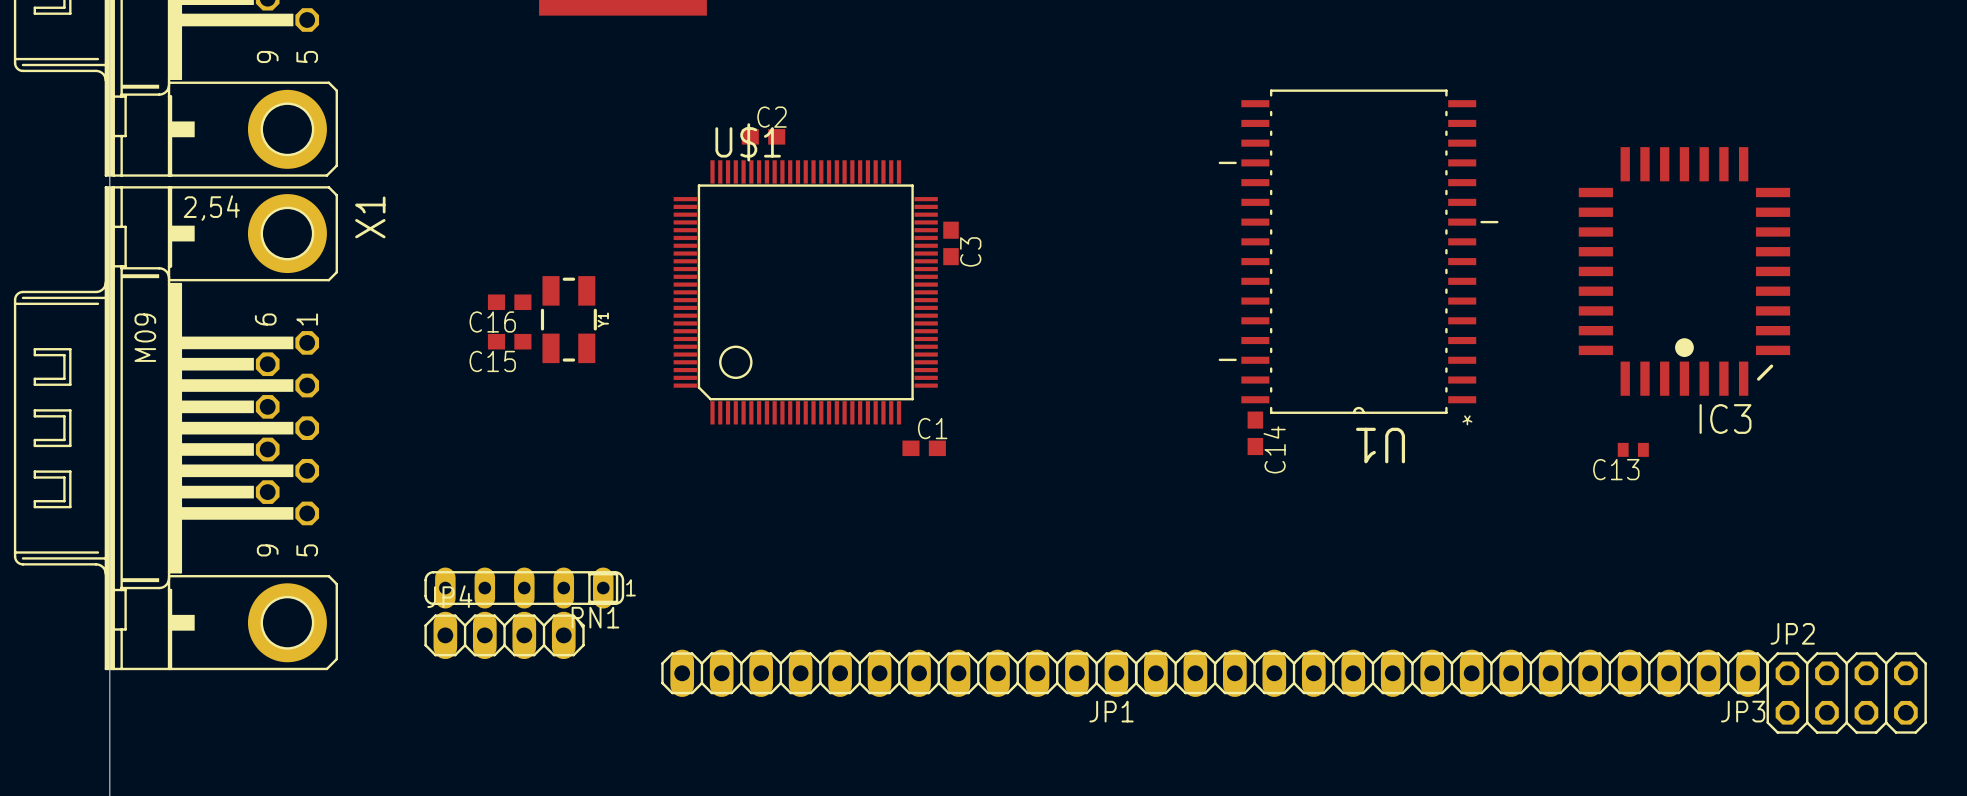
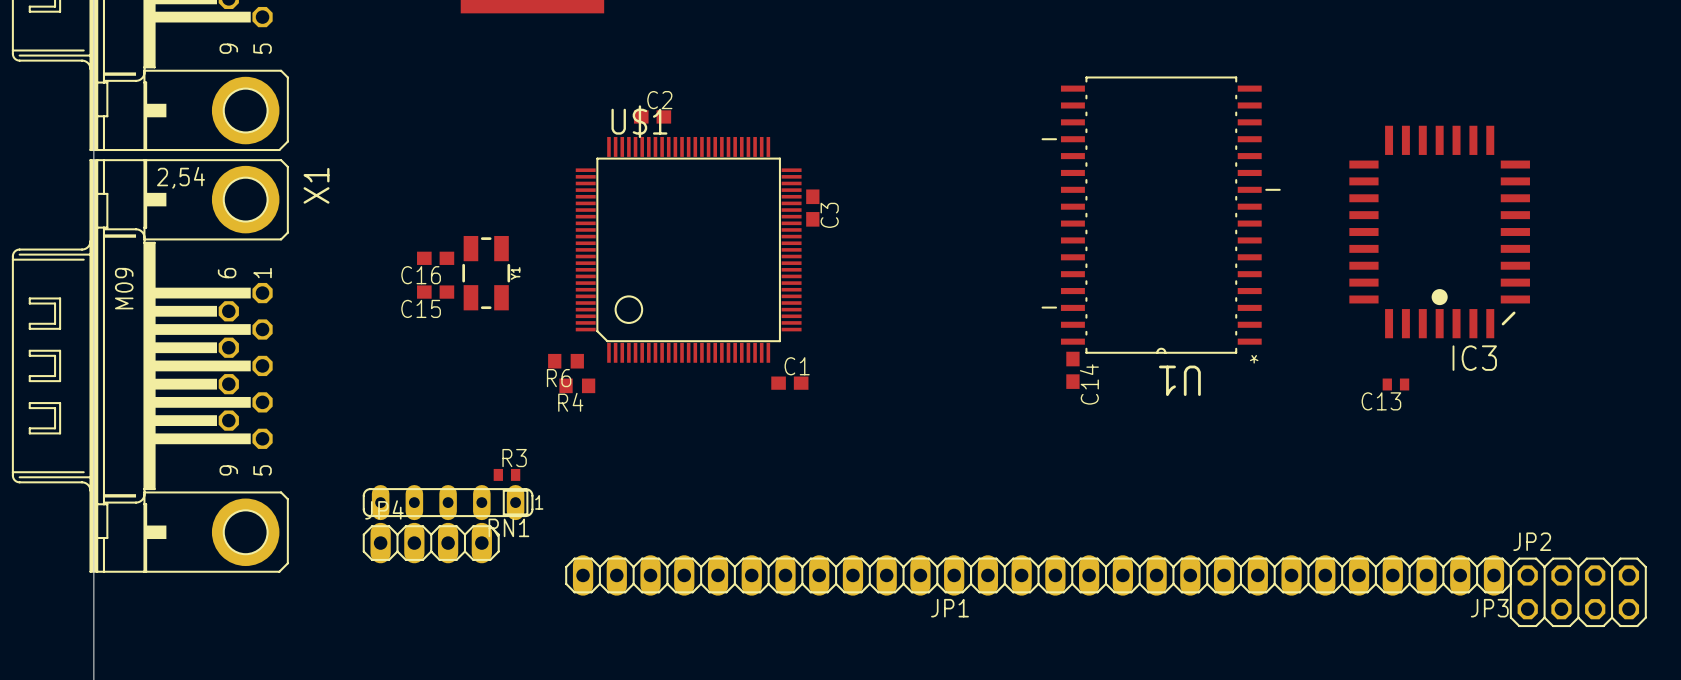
R6: none -> (566, 361)
R4: none -> (577, 385)
R3: none -> (506, 474)

